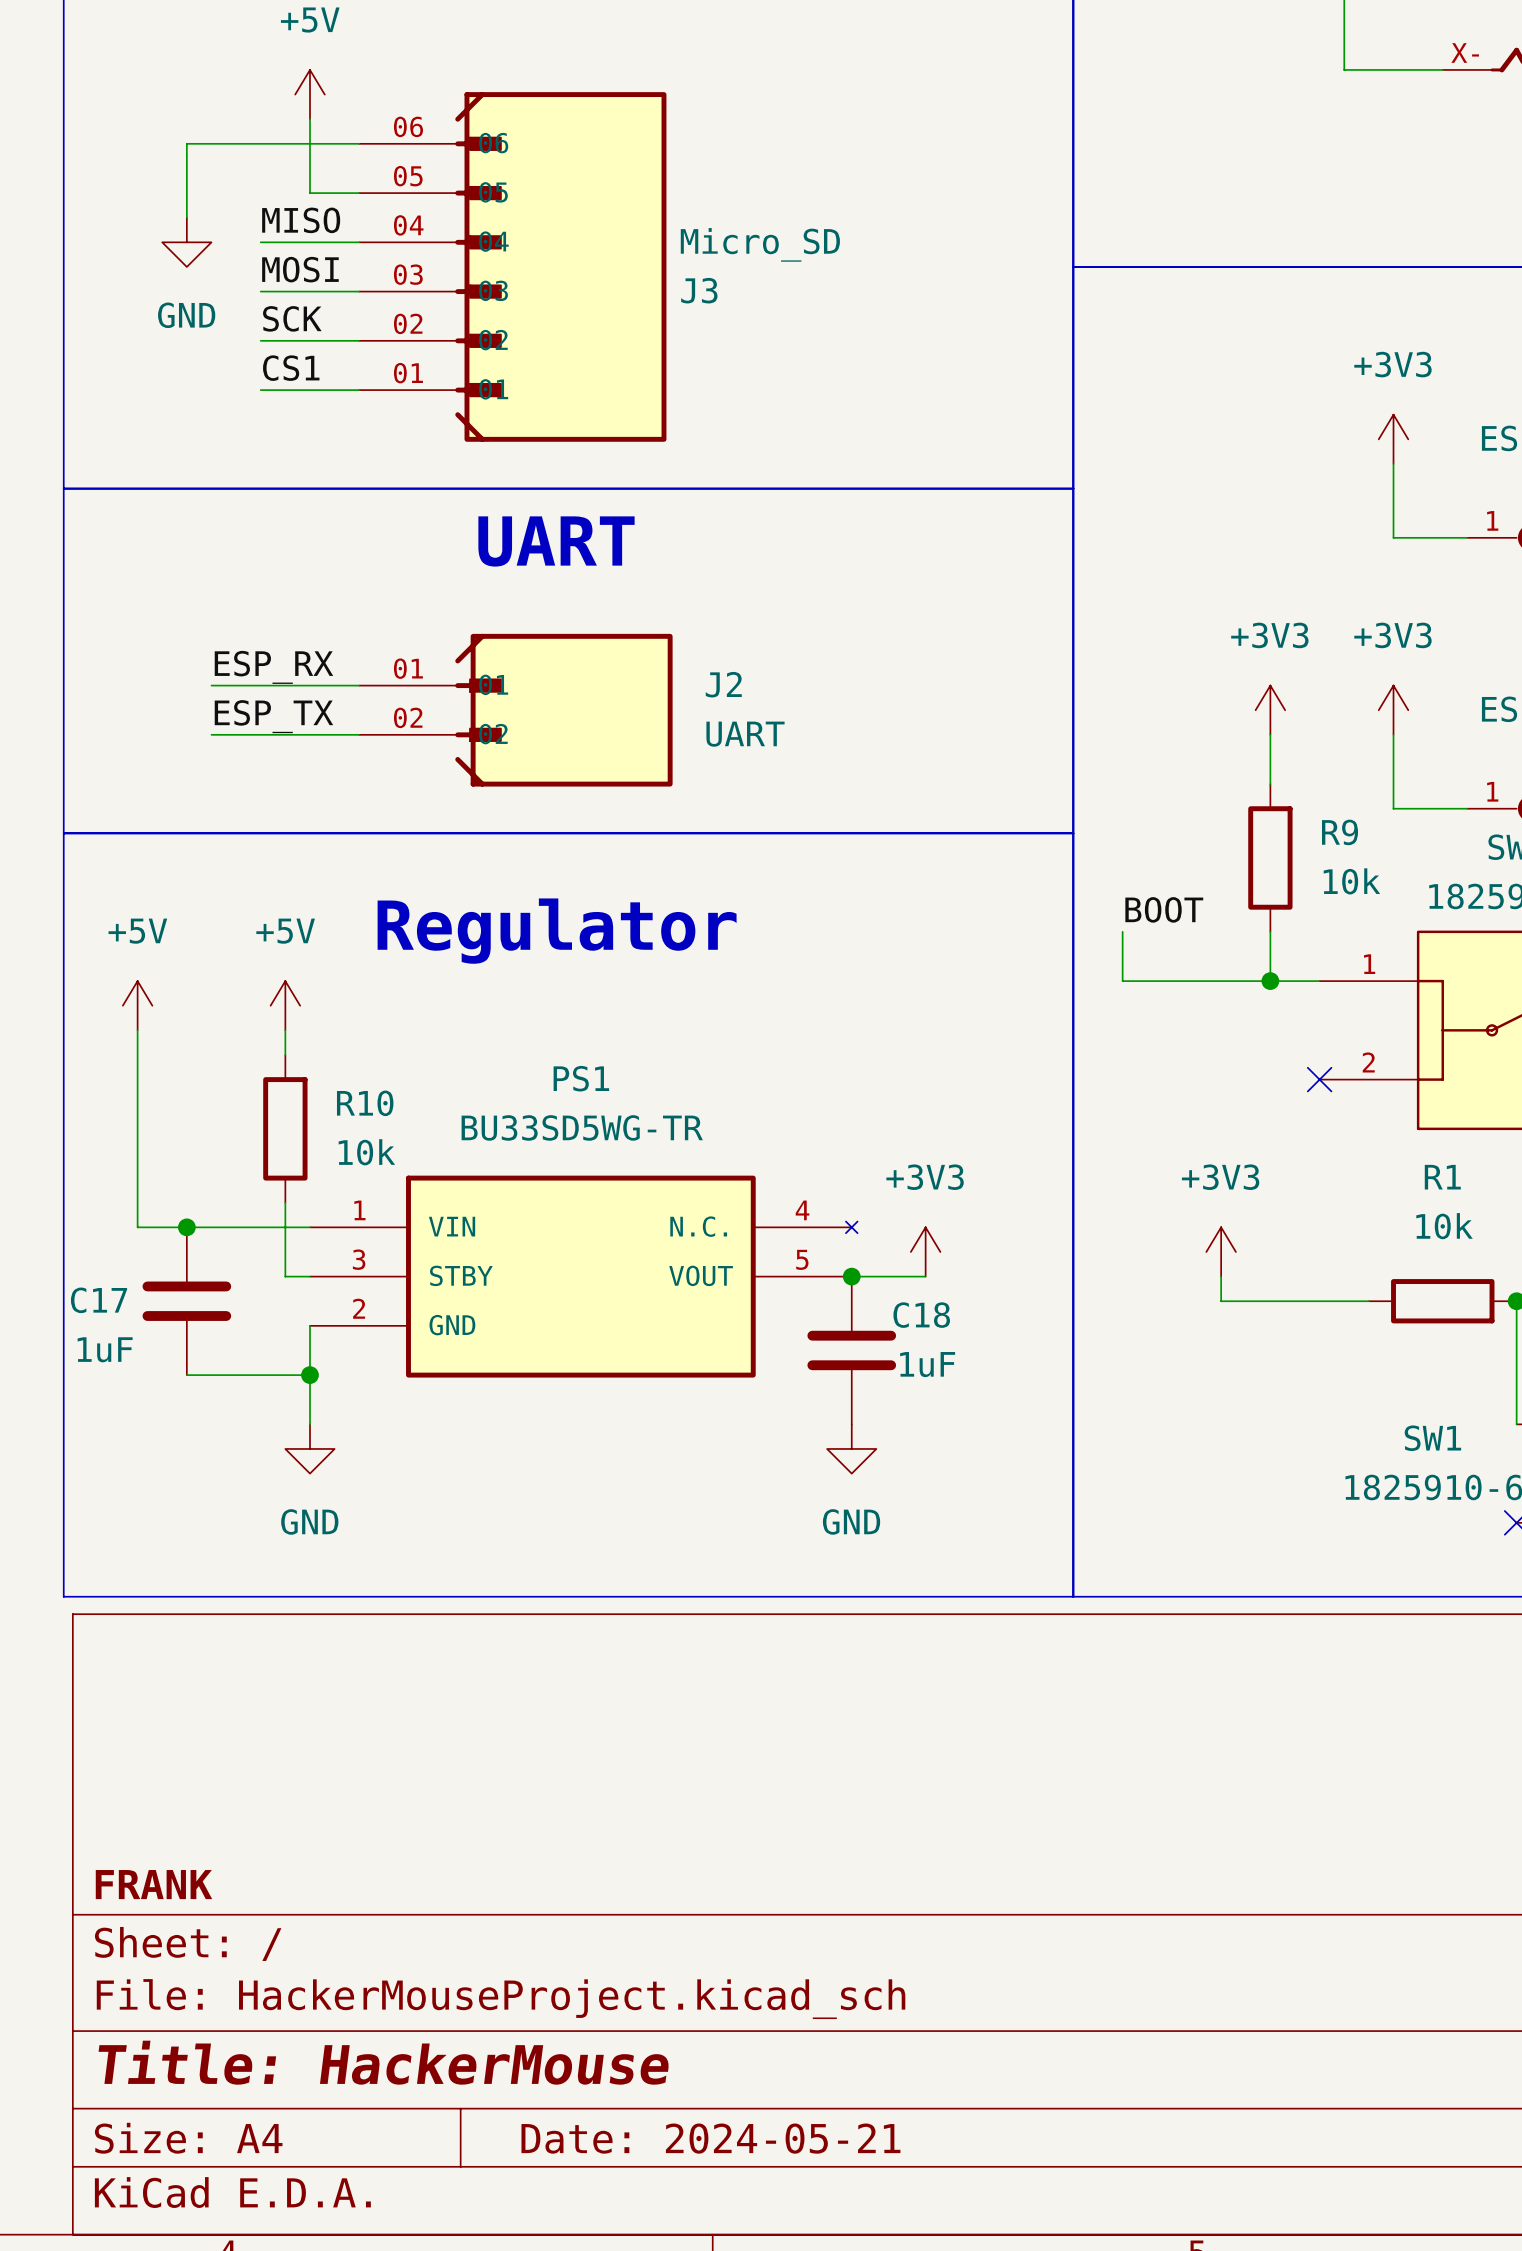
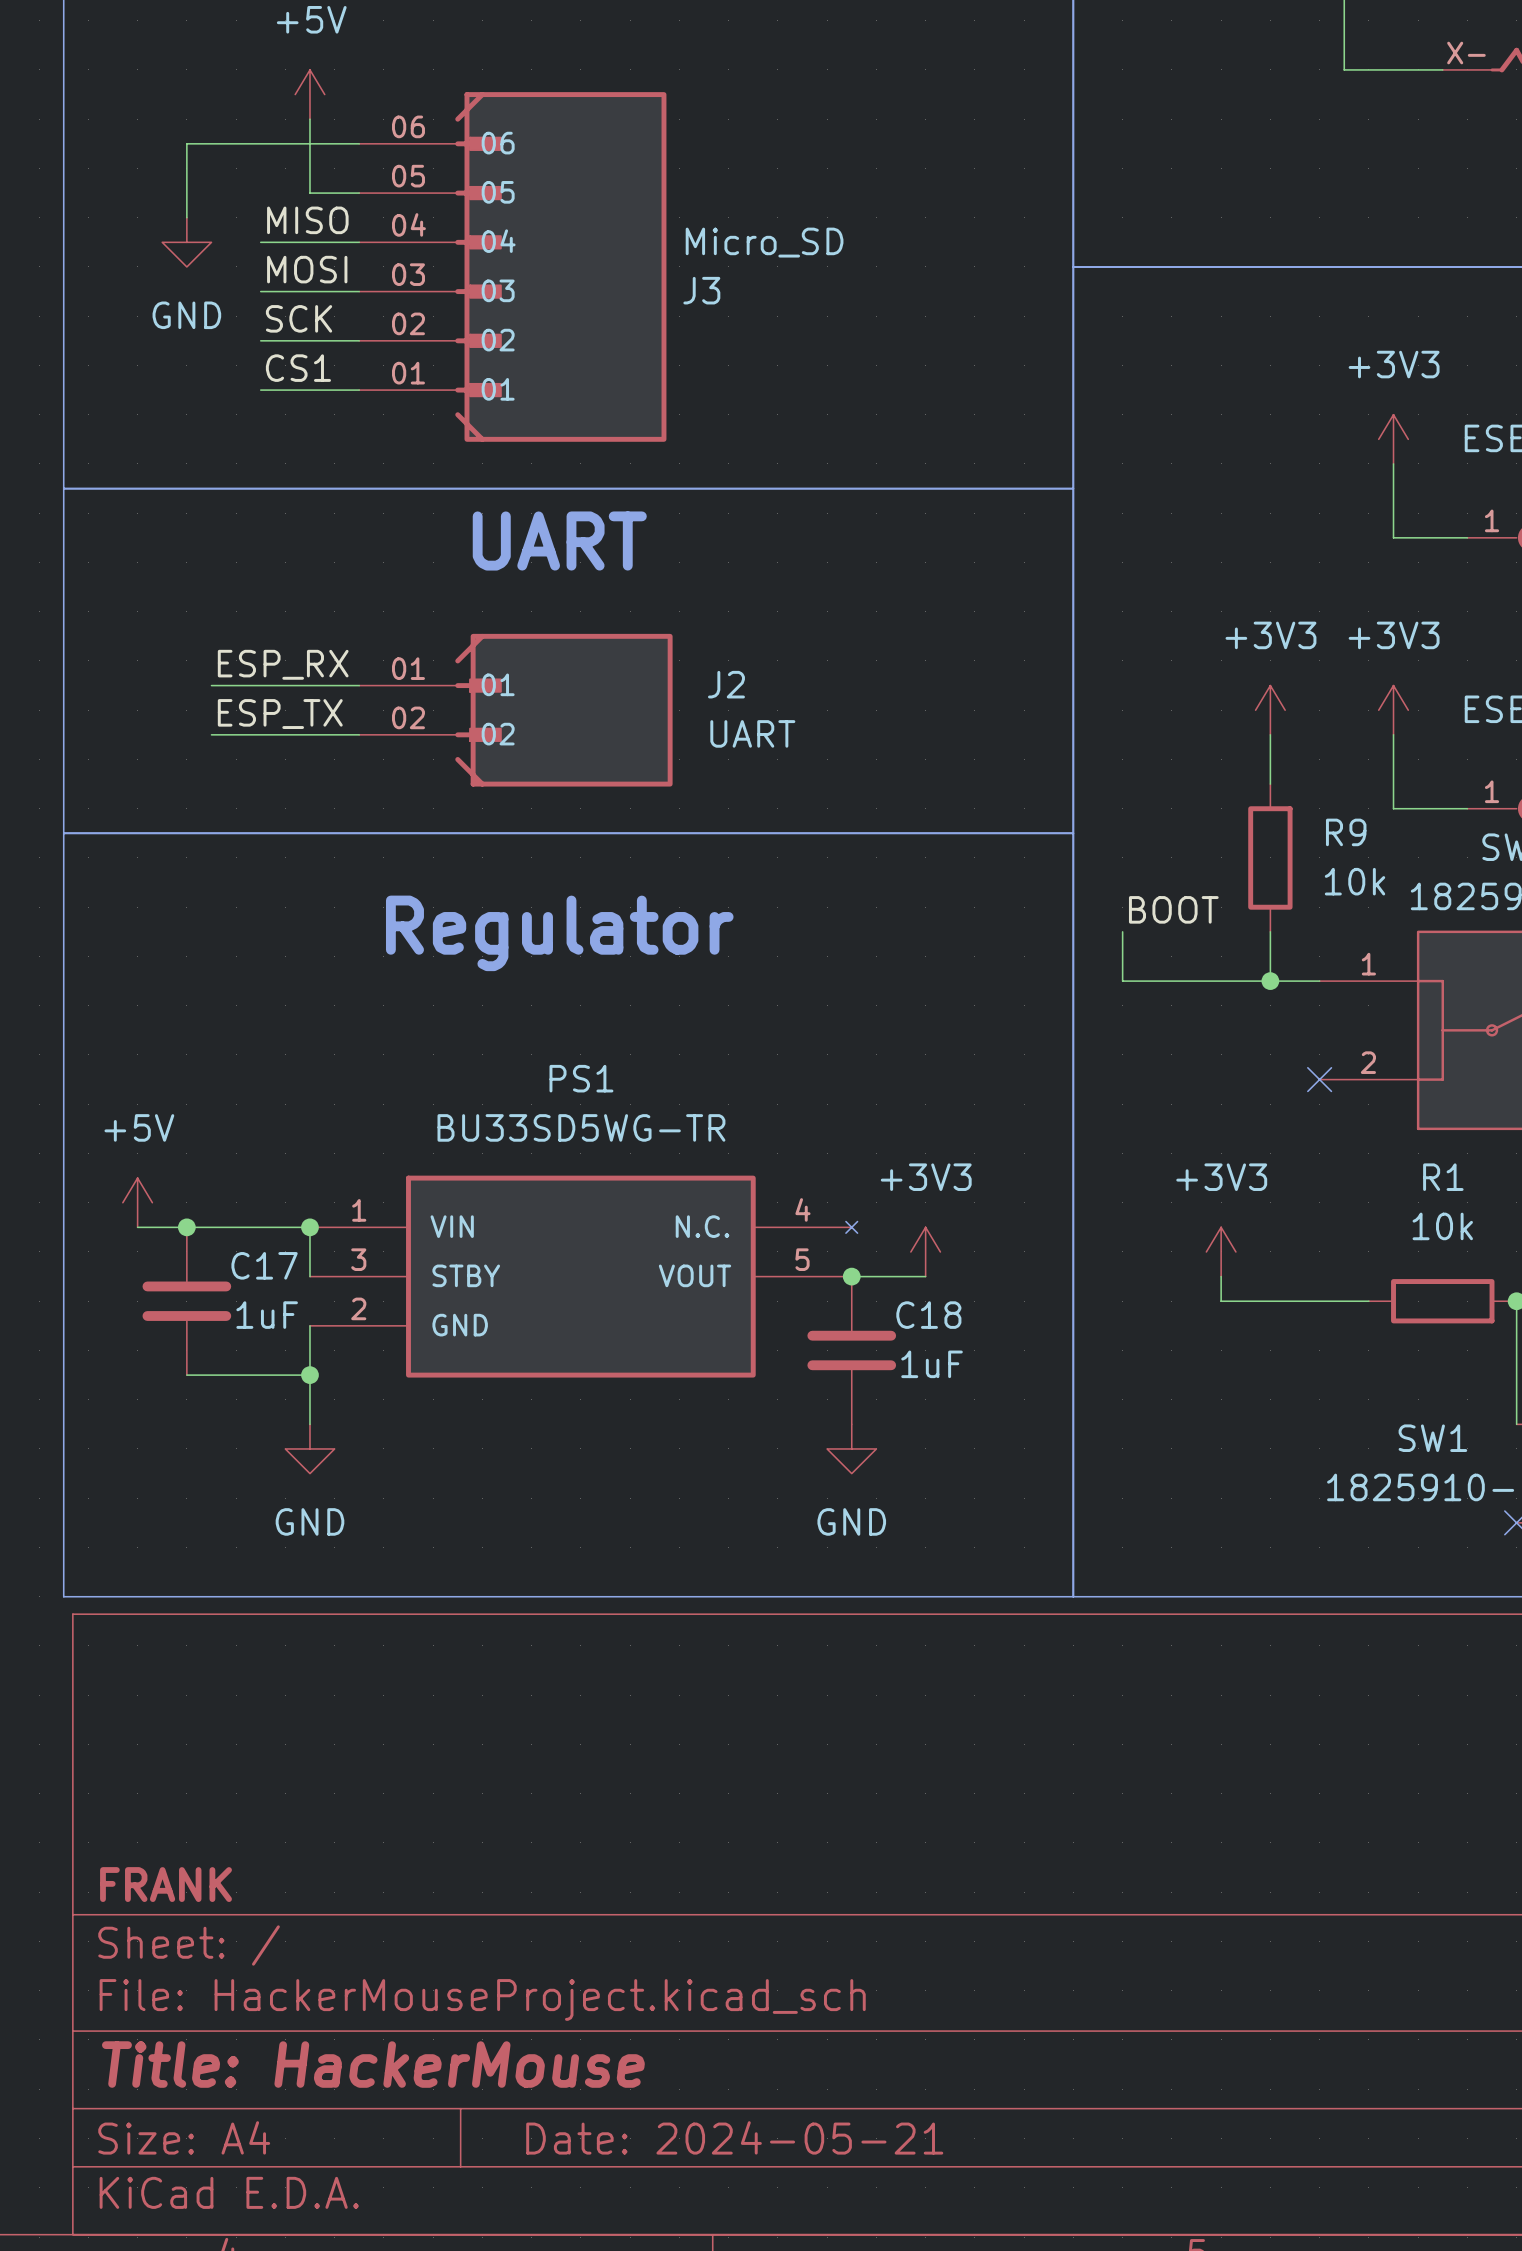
power symbol: +5V (137, 1005) -> none
power symbol: +5V (285, 1005) -> none
wire: (137, 1030) (137, 1227) -> none
wire: (285, 1030) (285, 1054) -> none
R10: 10k (285, 1128) -> none
power symbol: none -> +5V (137, 1202)
wire: (285, 1202) (285, 1276) (309, 1276) -> (309, 1227) (309, 1276)
junction: none -> (309, 1227)
C17 name position: C17 (99, 1300) -> C17 (264, 1265)
C17 value position: 1uF (105, 1349) -> 1uF (267, 1315)

